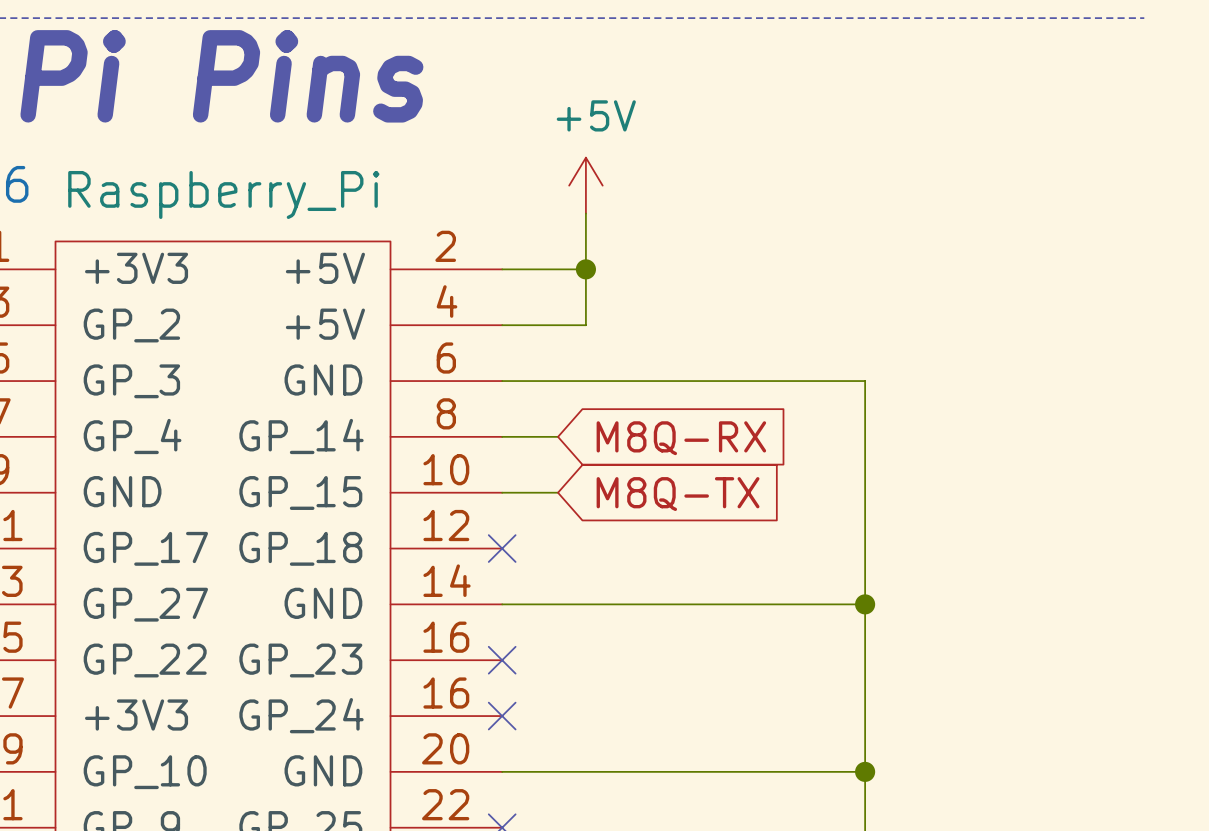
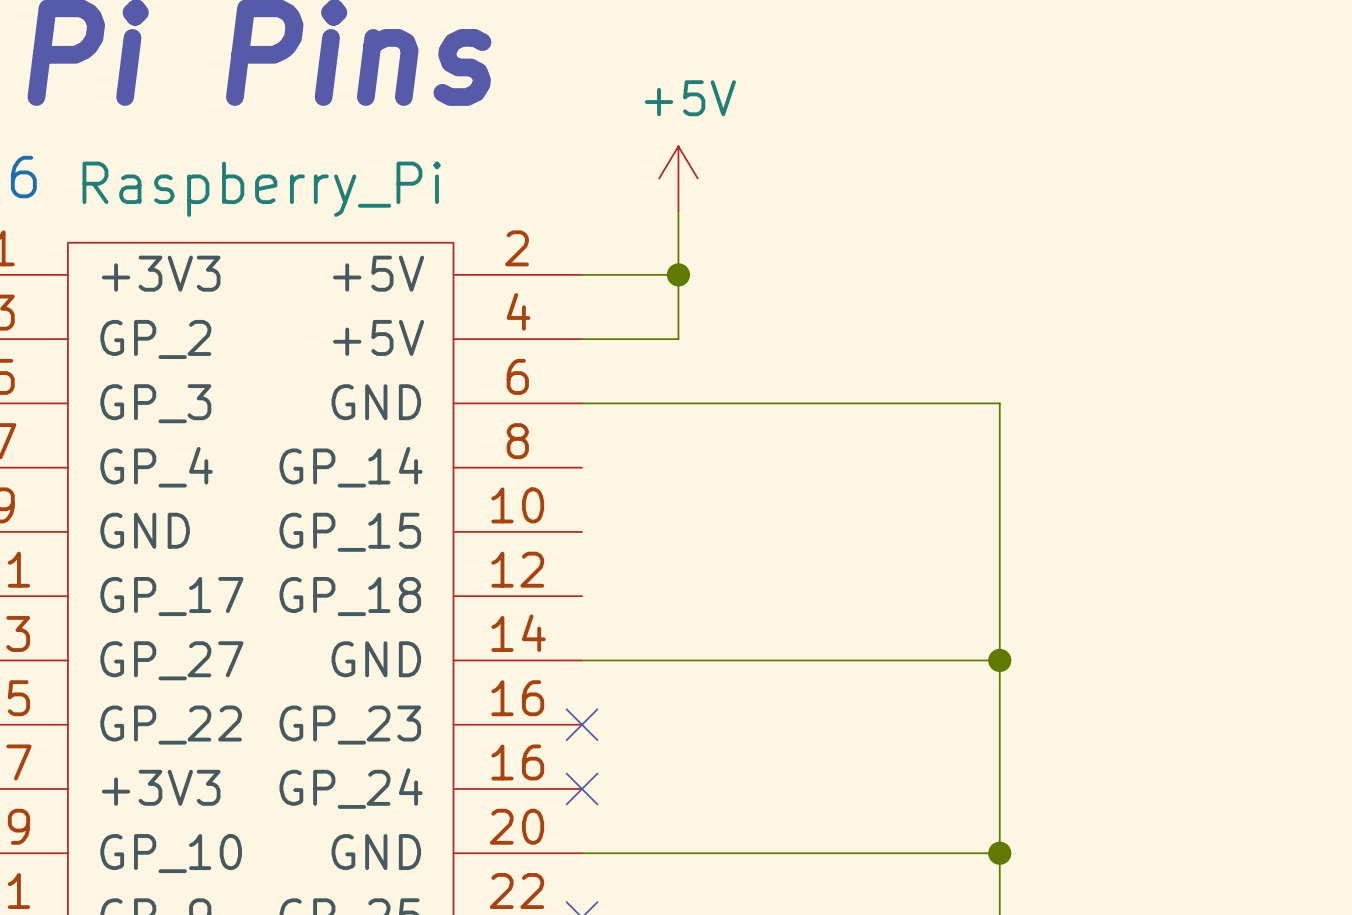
wire: (502, 436) (558, 436) -> none
global label: M8Q-RX (681, 438) -> none
wire: (502, 492) (558, 492) -> none
global label: M8Q-TX (678, 494) -> none
no-connect mark: (502, 548) -> none

